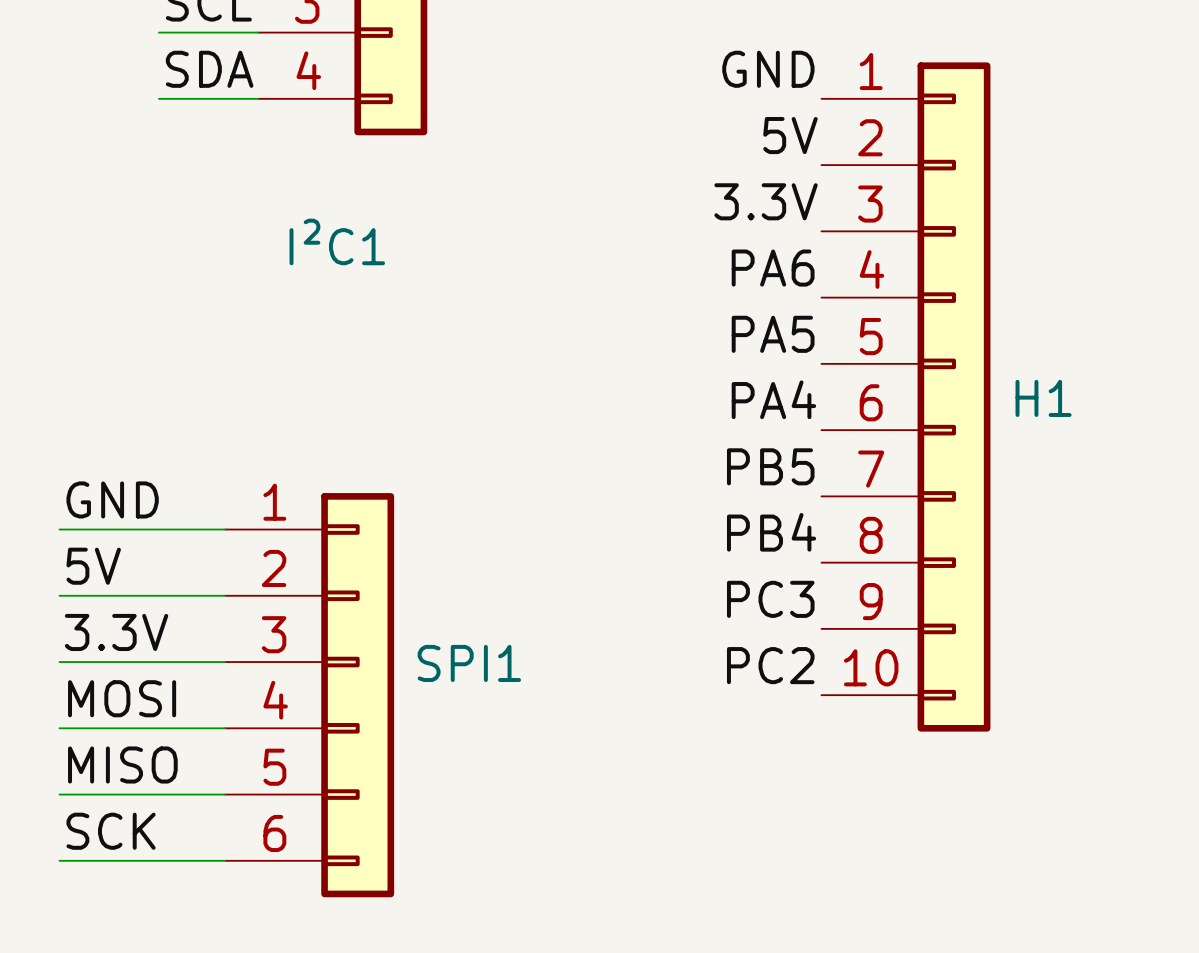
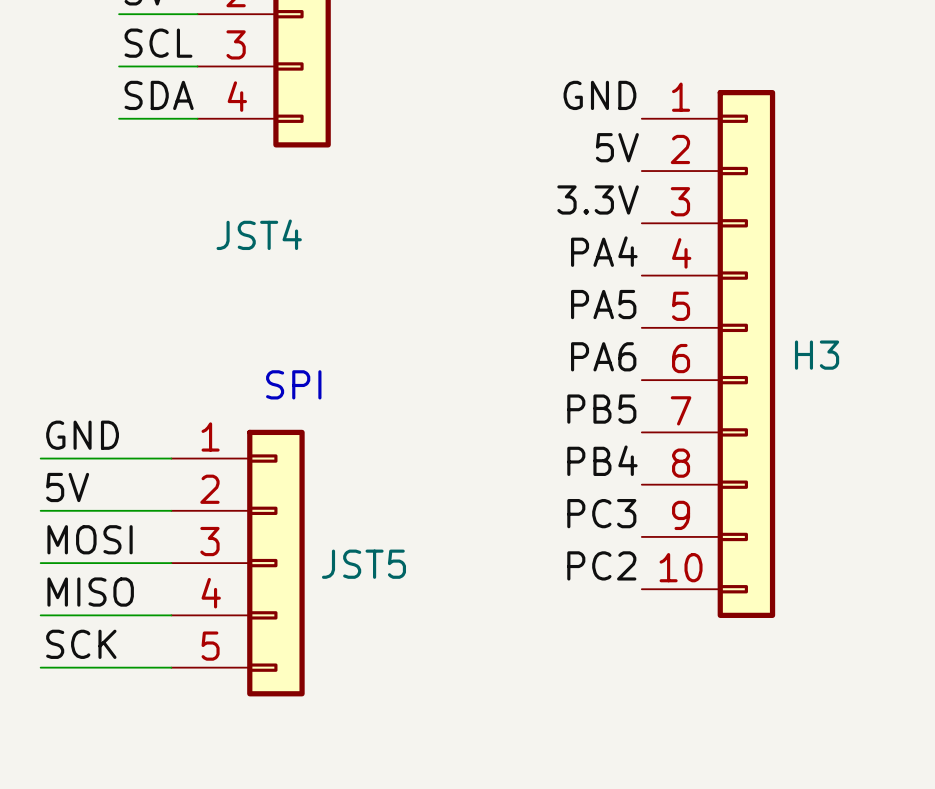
I²C1 name: I²C1 (337, 241) -> JST4 (259, 234)
label: PA6 (773, 268) -> PA4 (604, 251)
H1 name: H1 (1043, 398) -> H3 (817, 355)
label: PA4 (773, 399) -> PA6 (603, 356)
text: none -> SPI (293, 384)
label: 3.3V (116, 632) -> MOSI (90, 539)
JST5: none -> (238, 563)
SPI1: (309, 695) -> none
label: MOSI (122, 698) -> MISO (90, 592)
label: MISO (122, 764) -> SCK (81, 644)
label: SCK (111, 831) -> none
wire: (59, 860) (225, 860) -> none

